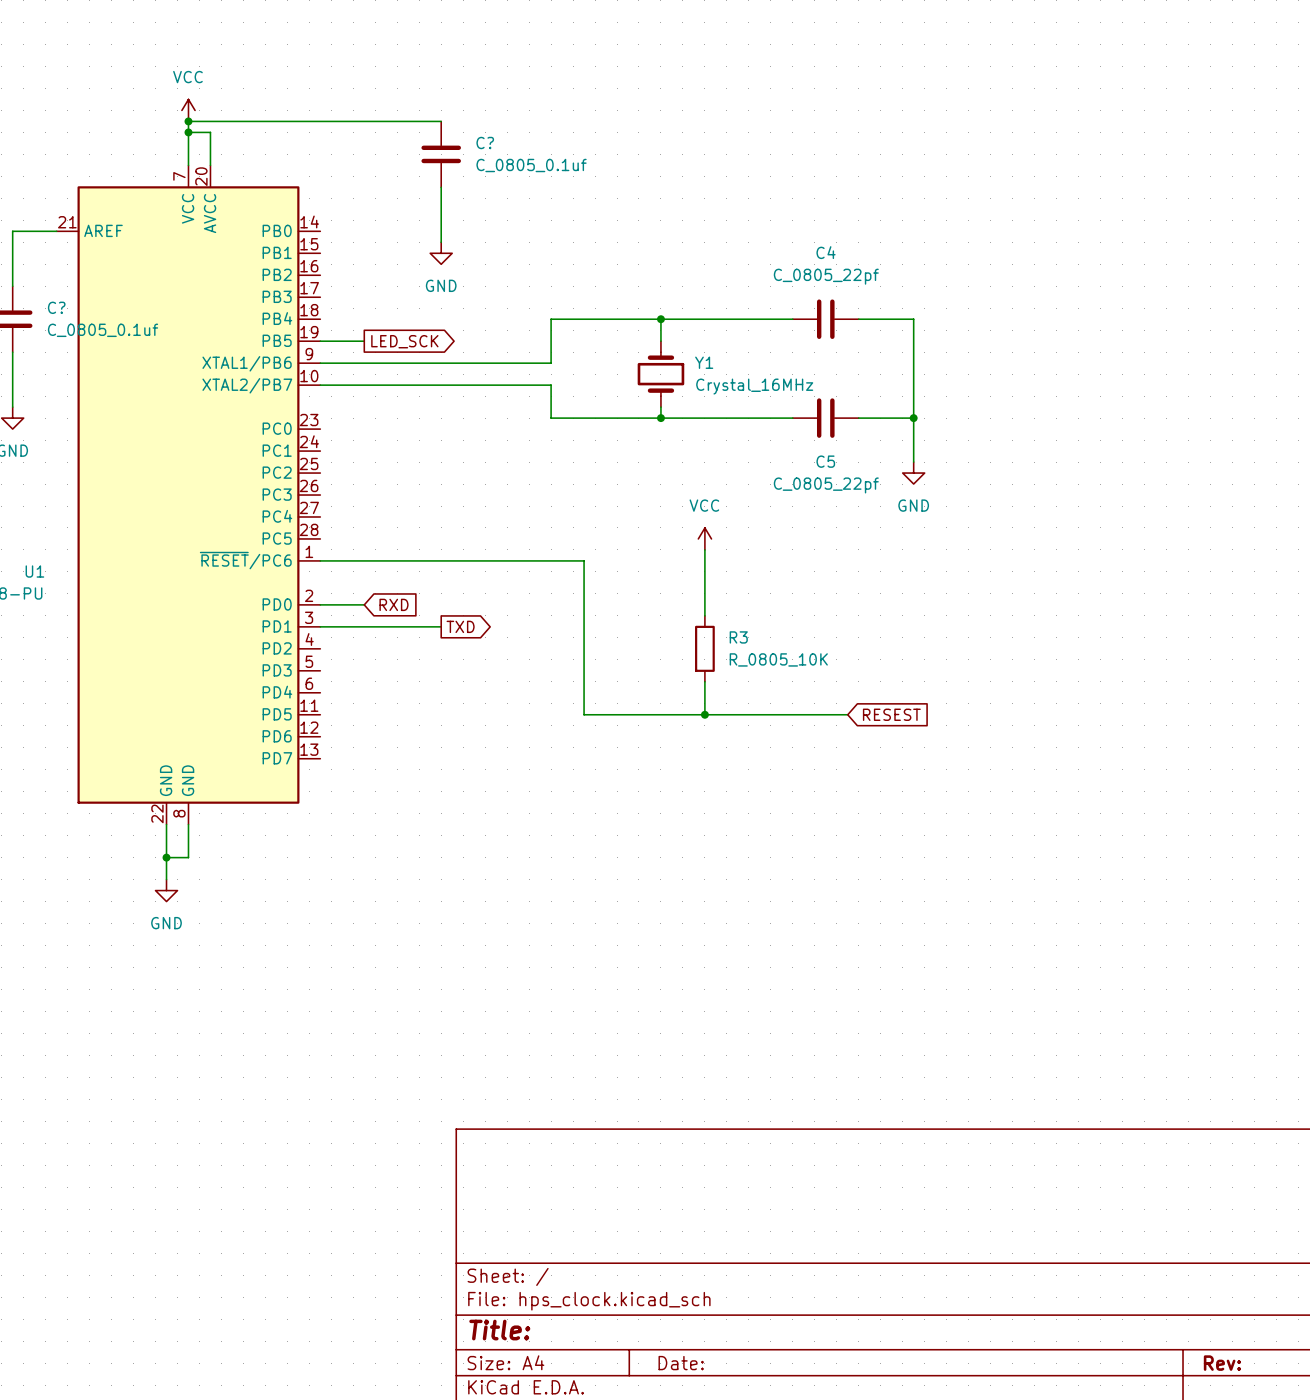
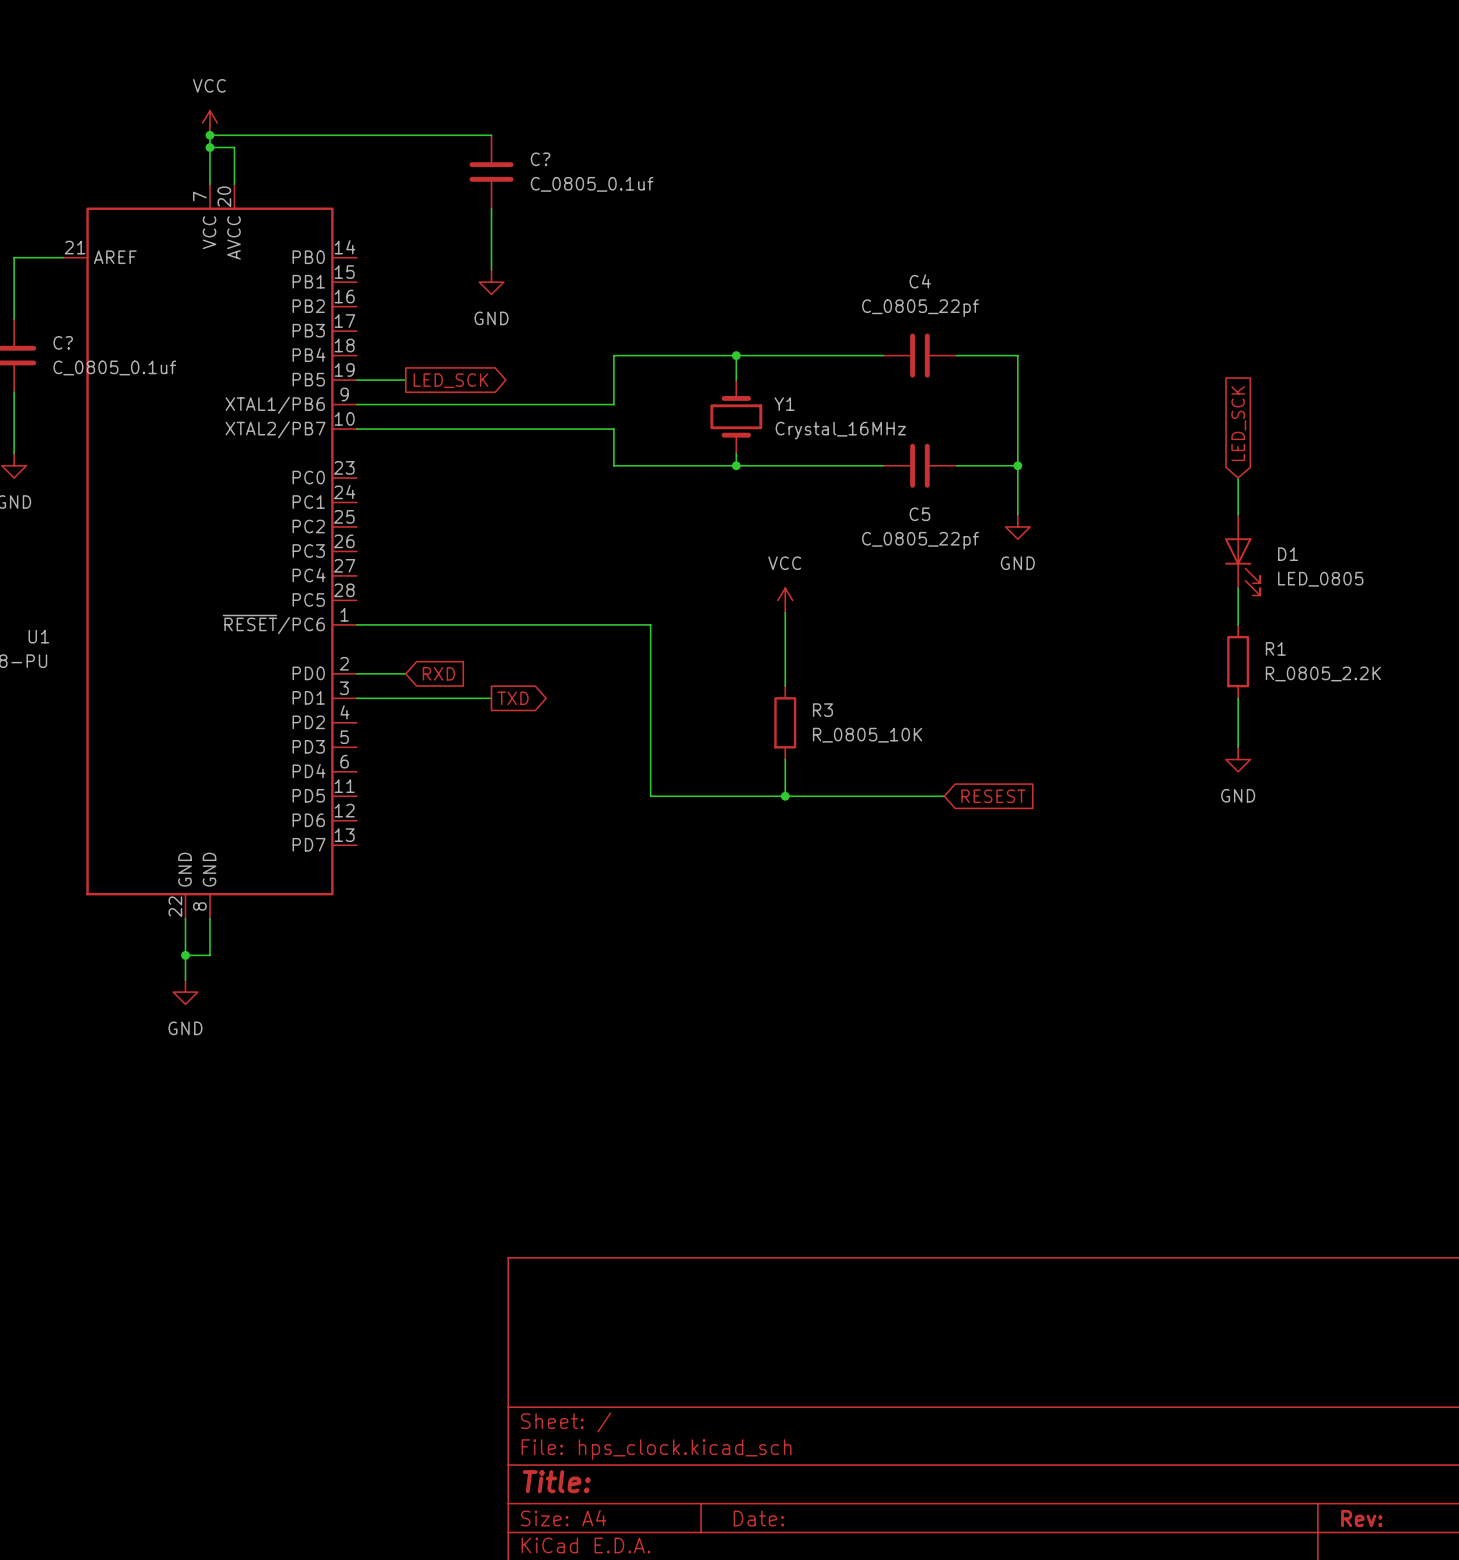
global label: none -> LED_SCK (1238, 423)
wire: none -> (1238, 478) (1238, 514)
D1: none -> LED_0805 (1242, 555)
wire: none -> (1238, 588) (1238, 624)
R1: none -> R_0805_2.2K (1238, 661)
wire: none -> (1238, 698) (1238, 747)
power symbol: none -> GND (1238, 759)

